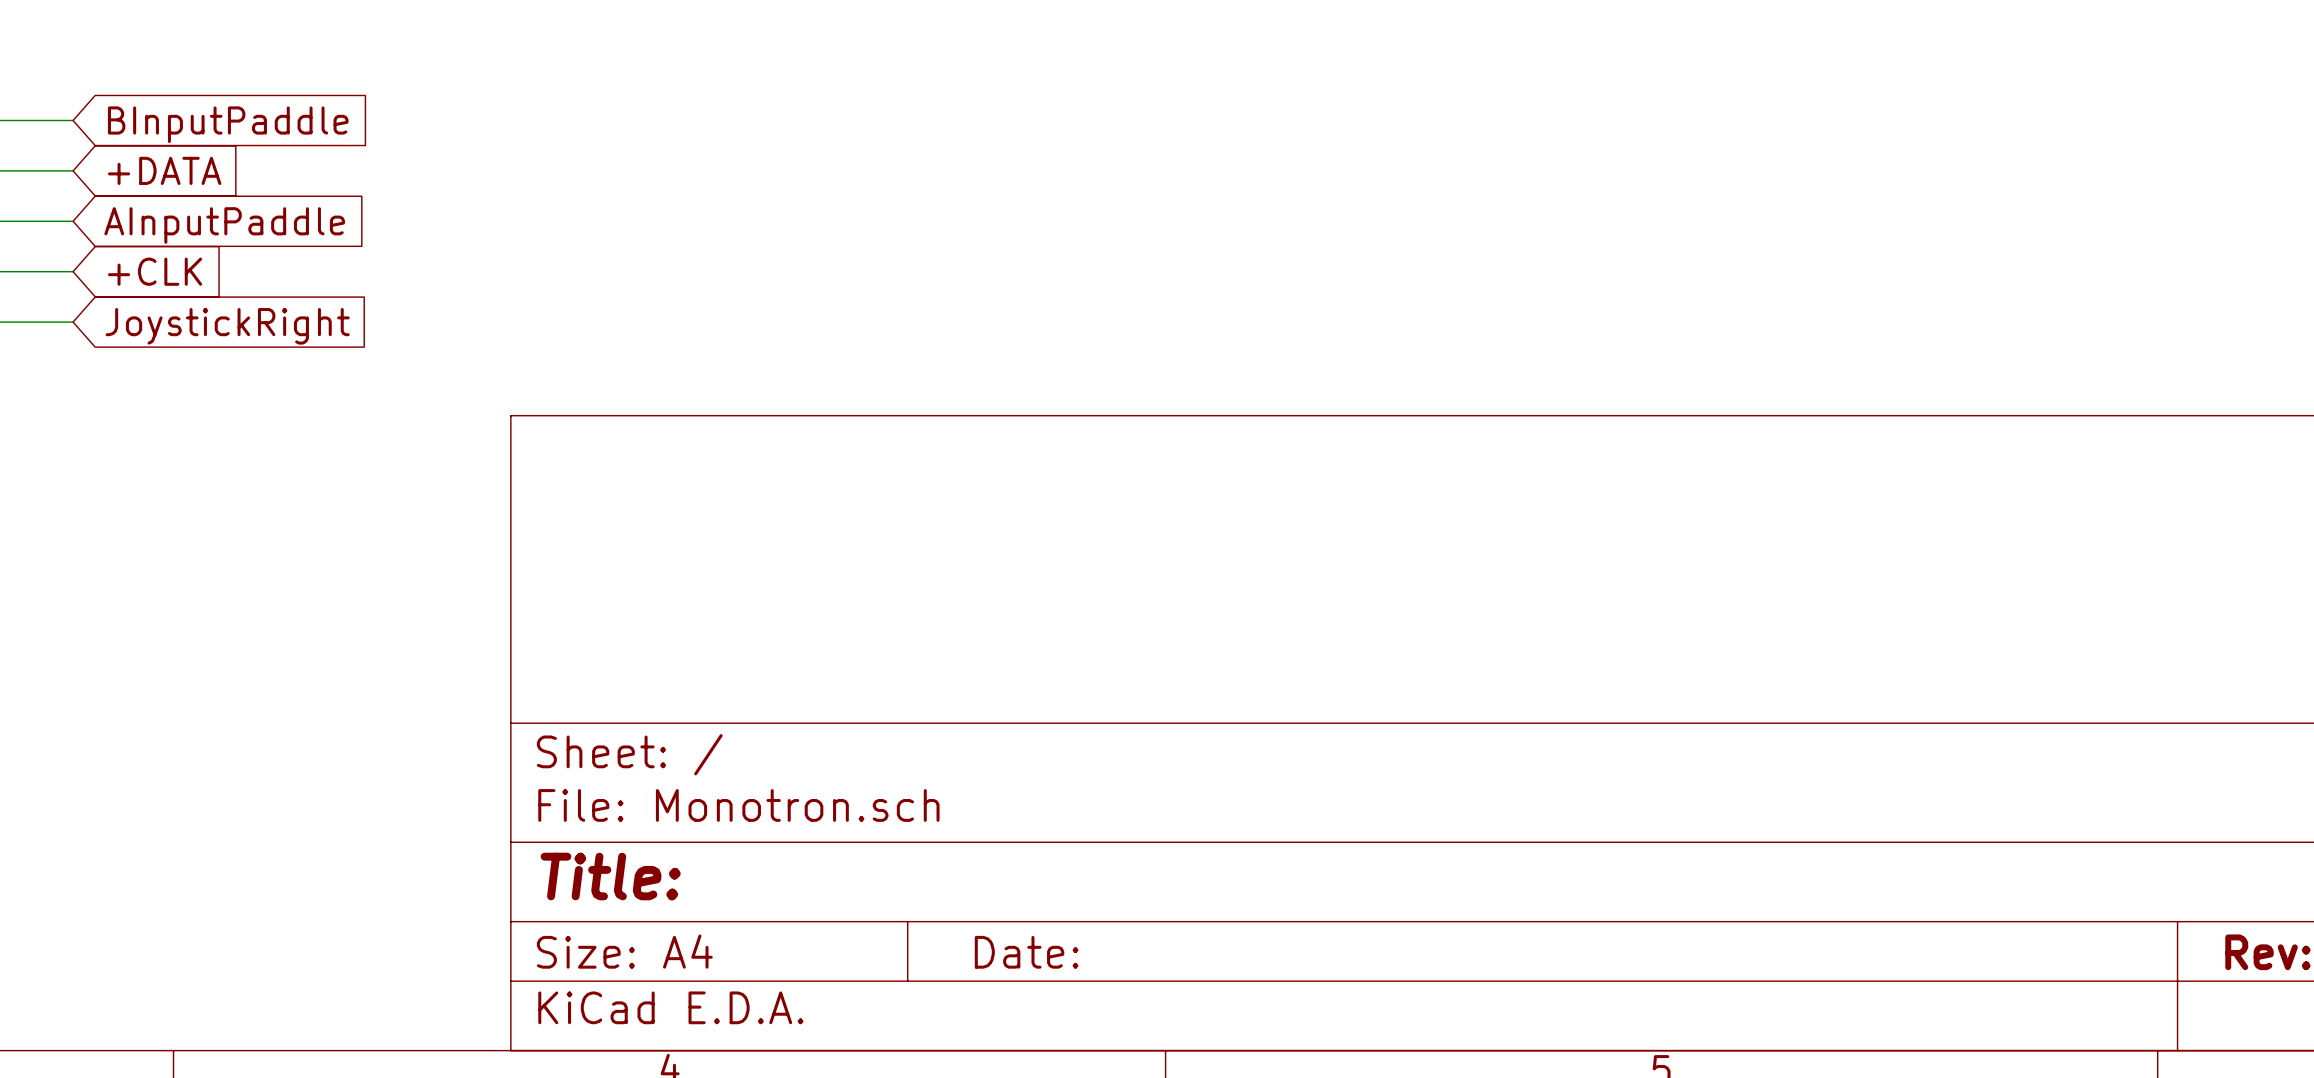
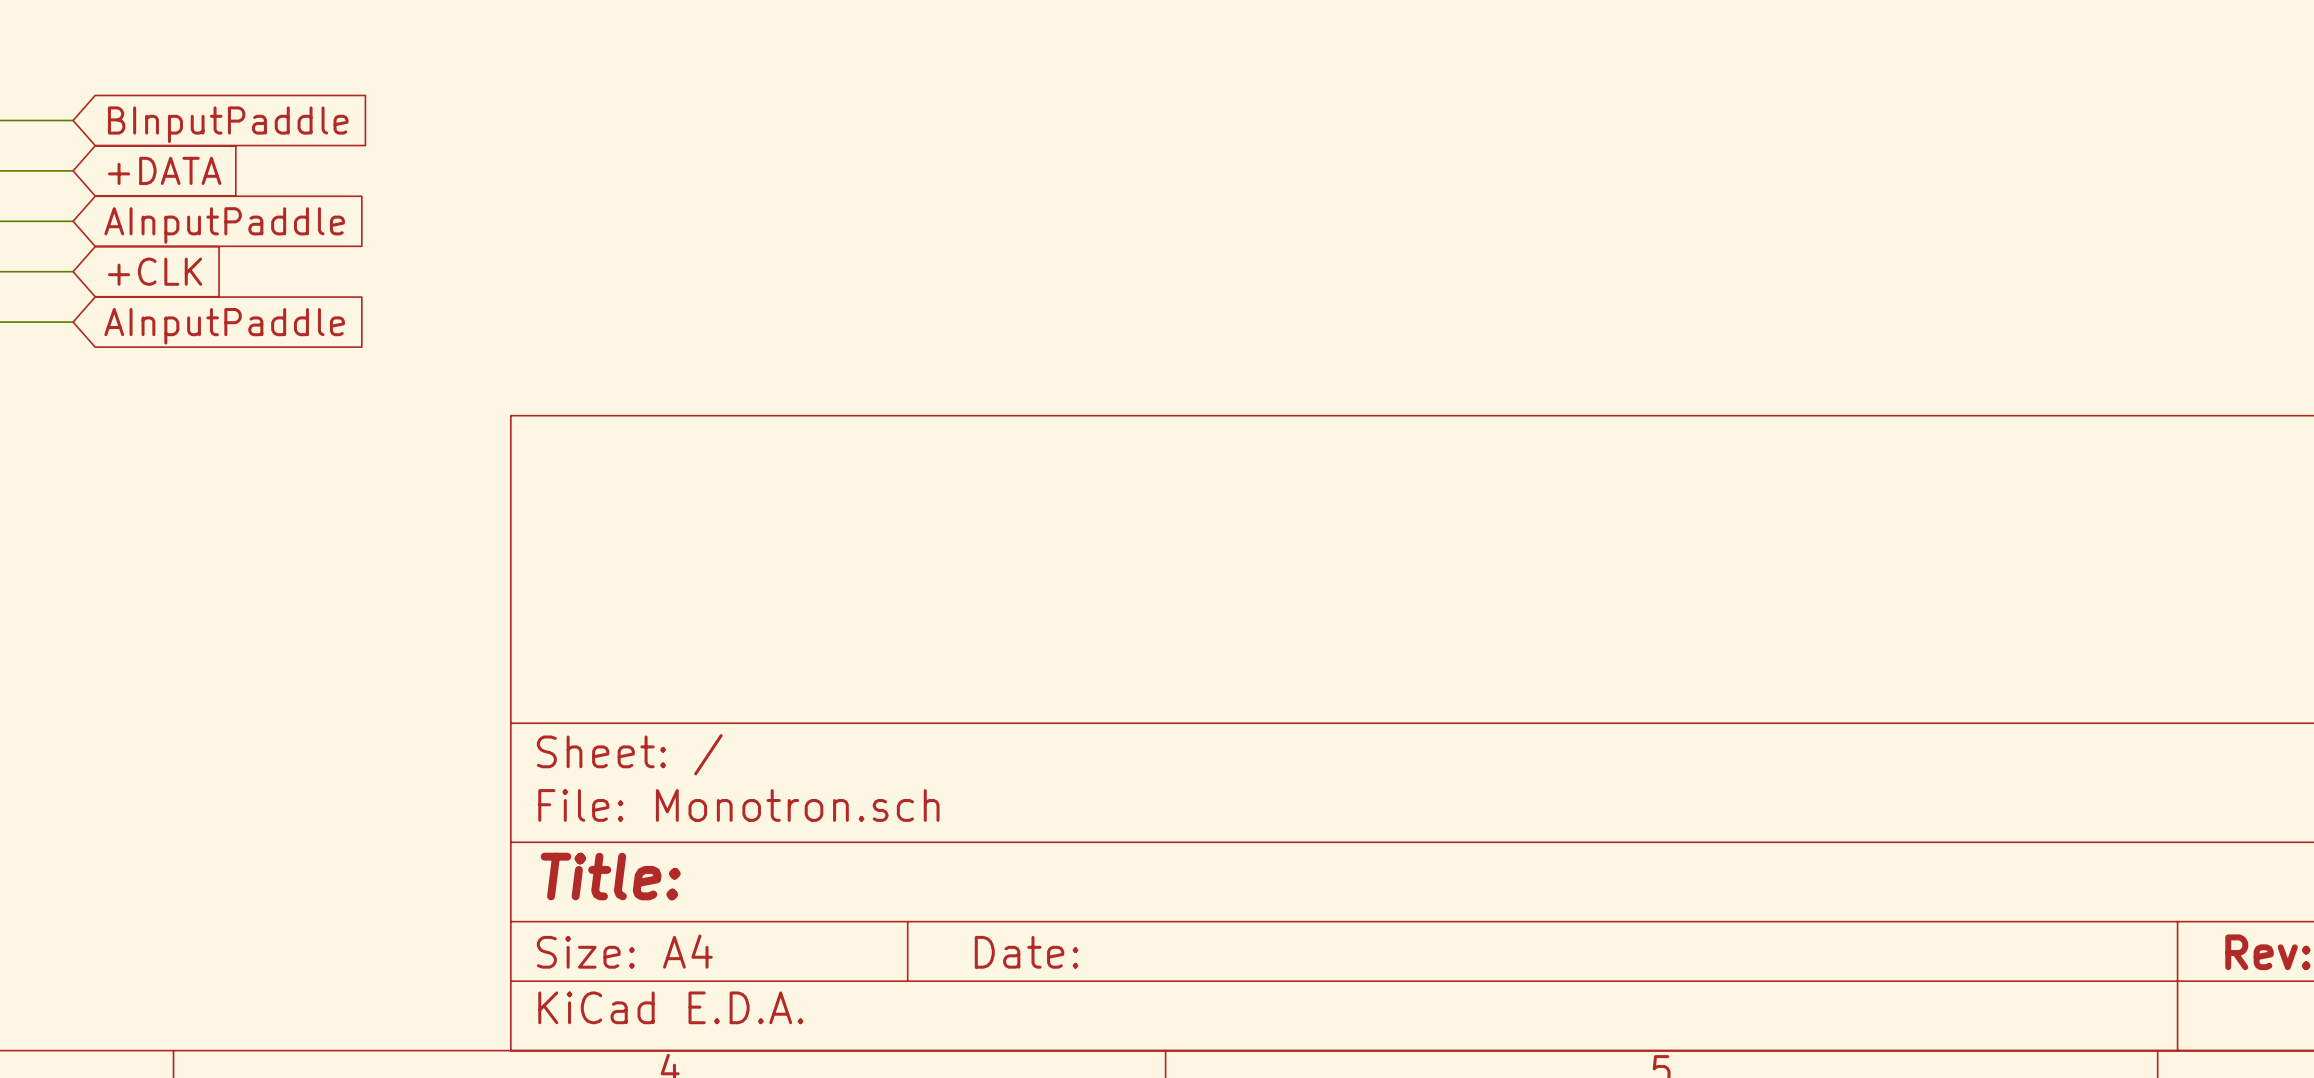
global label: JoystickRight (227, 326) -> AInputPaddle (224, 326)

